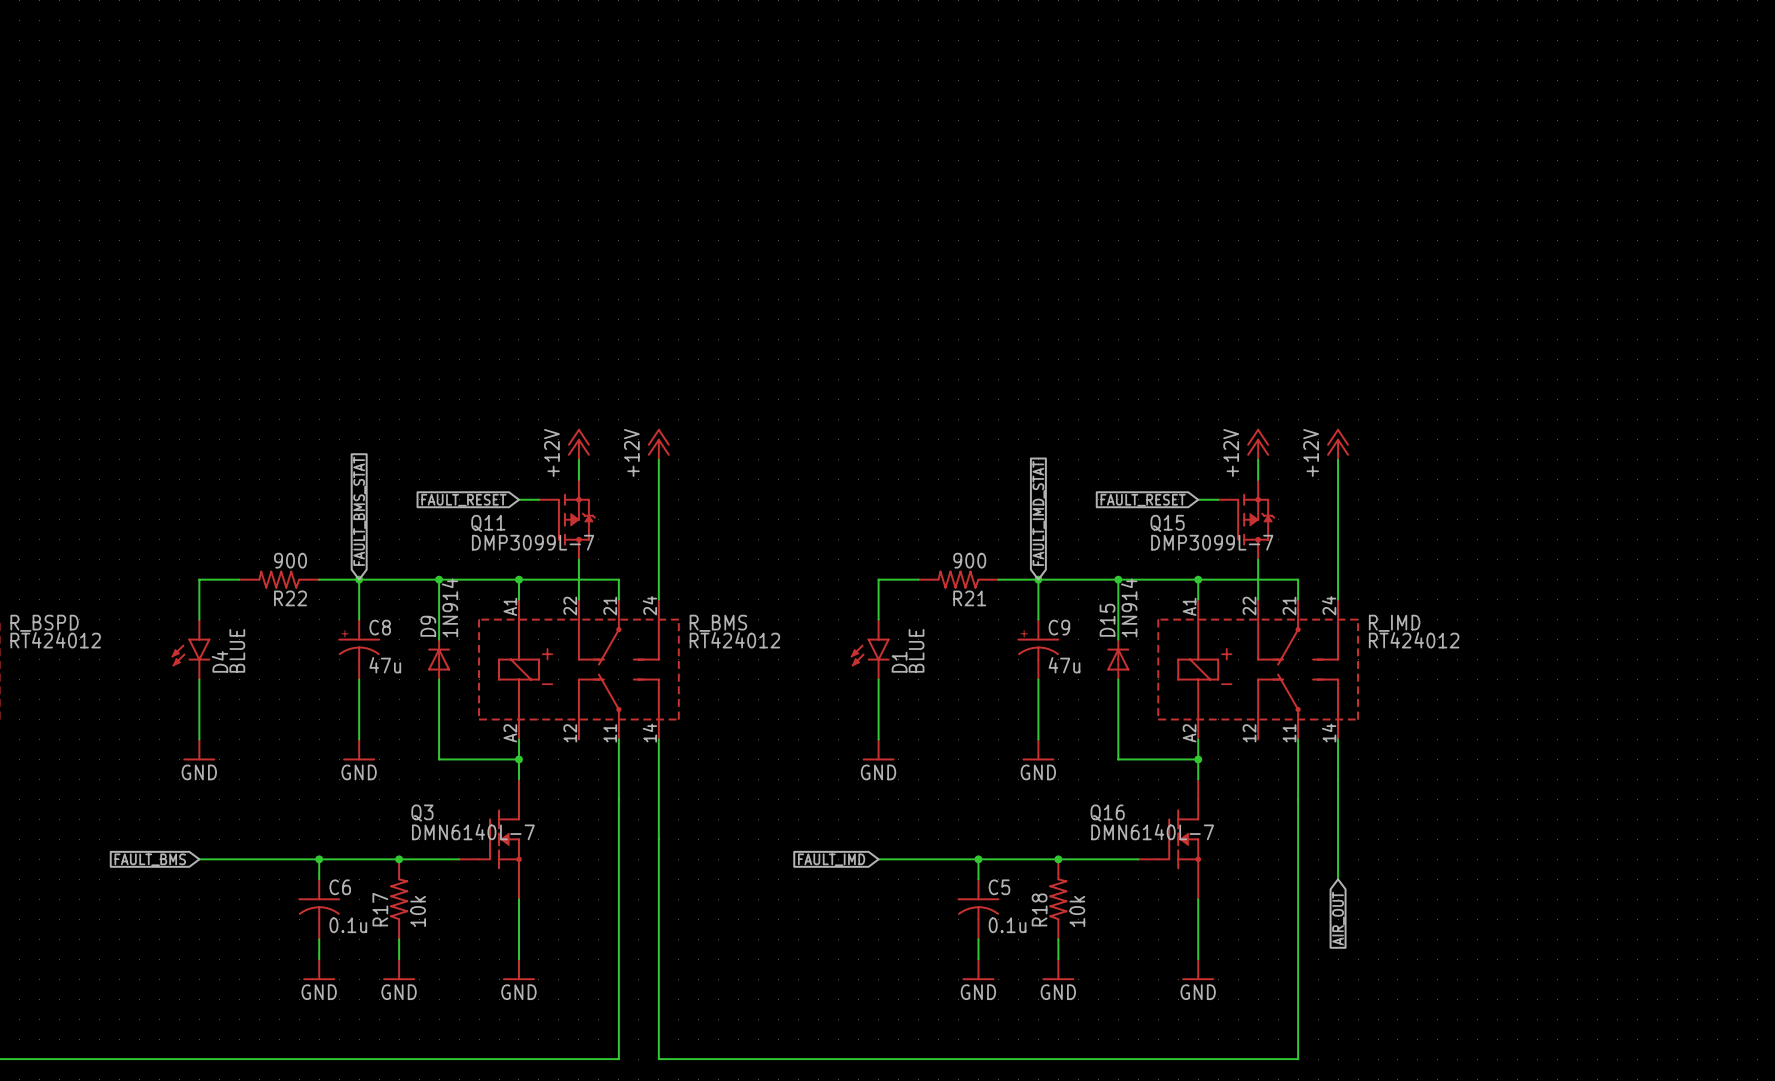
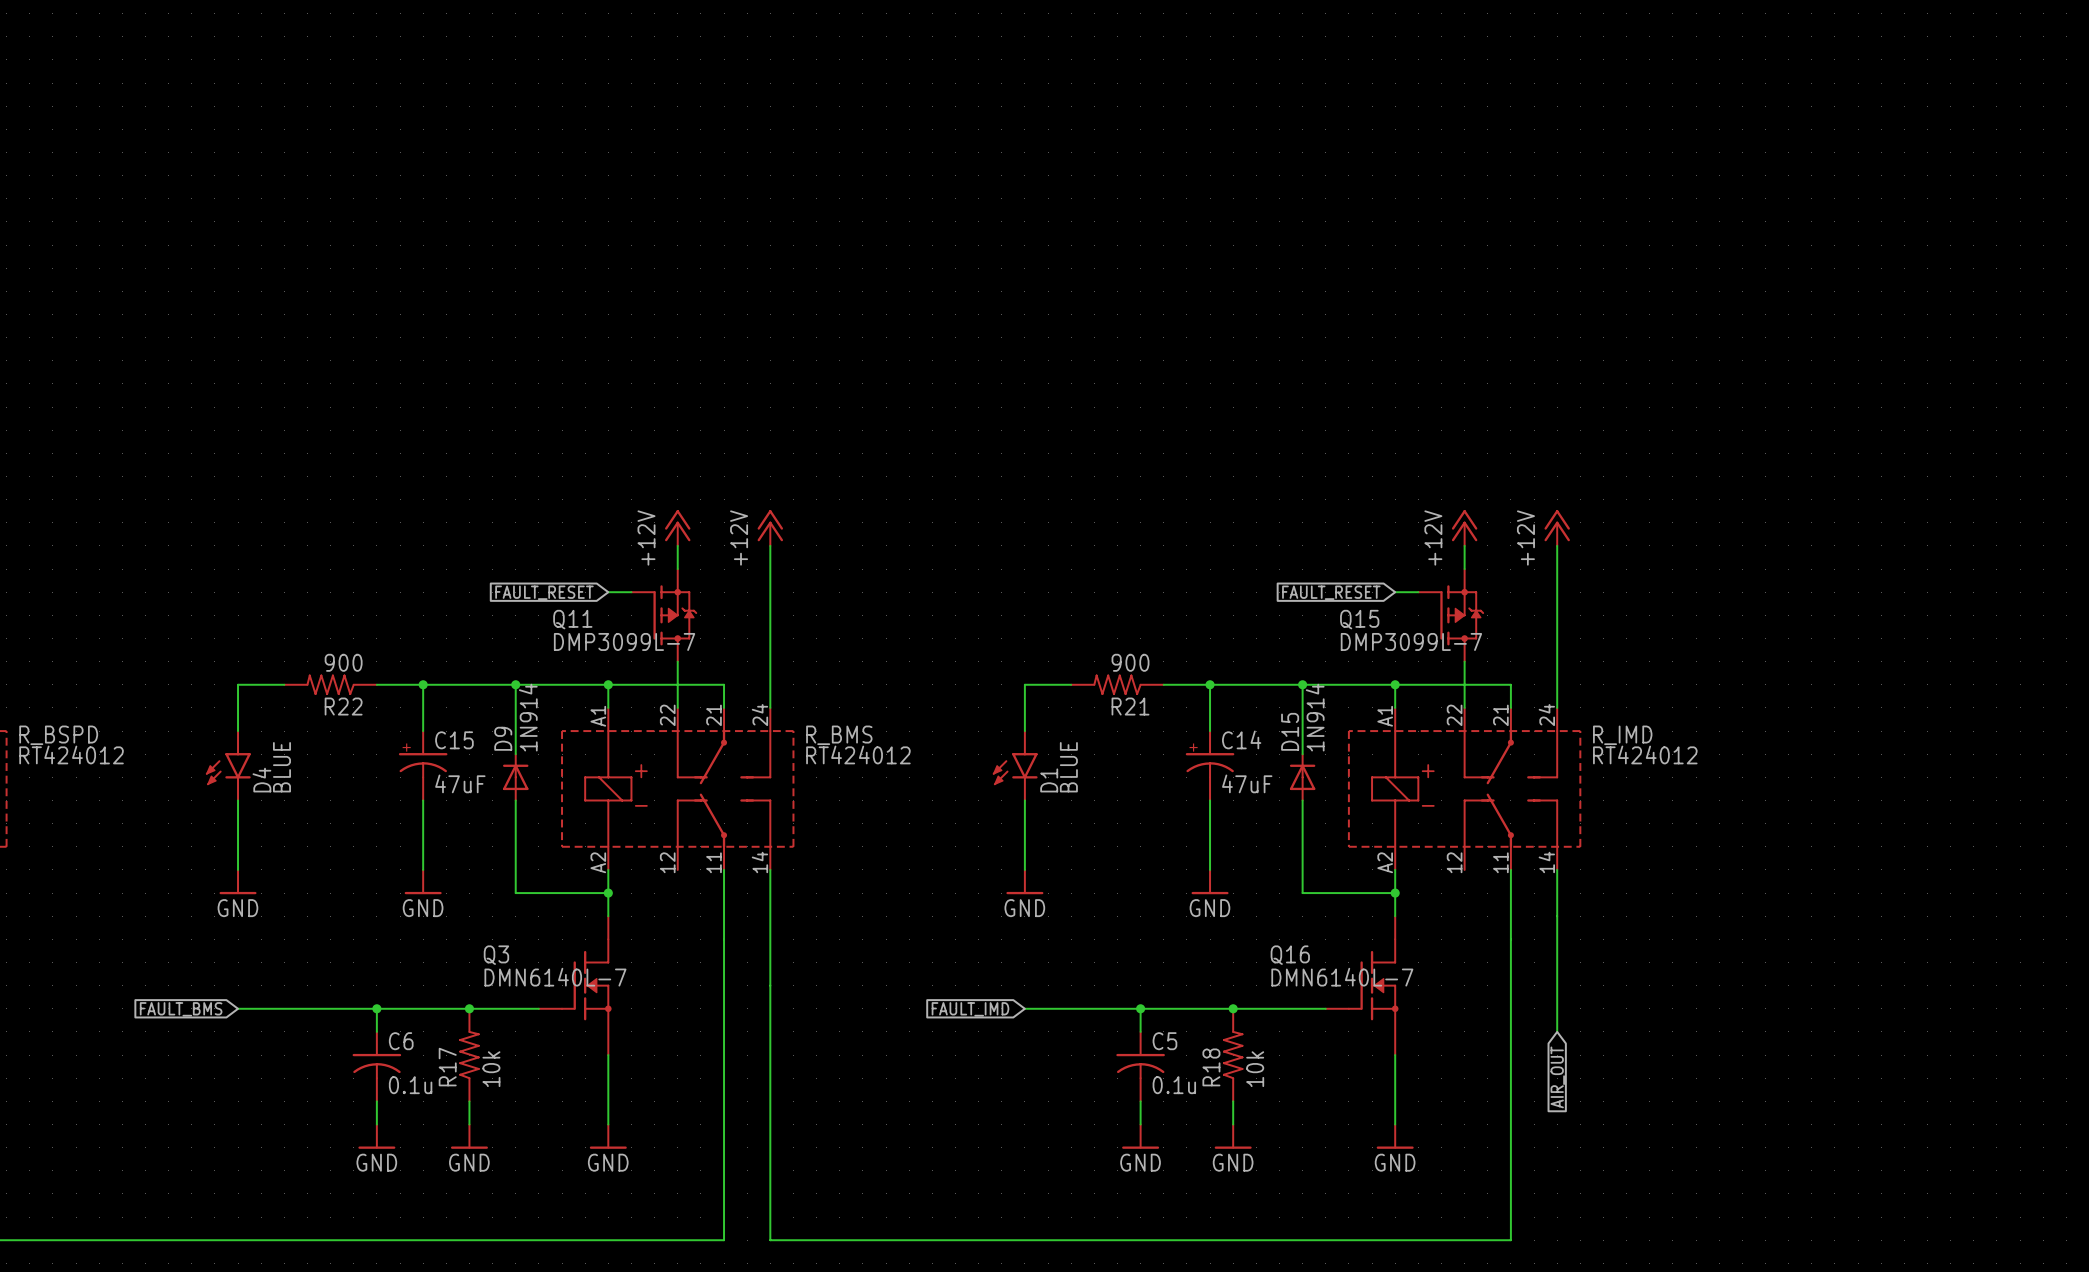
global label: FAULT_BMS_STAT (359, 511) -> none
global label: FAULT_IMD_STAT (1038, 513) -> none
C8 name: C8 (380, 627) -> C15 (454, 740)
C9 name: C9 (1059, 627) -> C14 (1241, 739)
C8 value: 47u (385, 665) -> 47uF (460, 783)
C9 value: 47u (1064, 665) -> 47uF (1247, 783)

